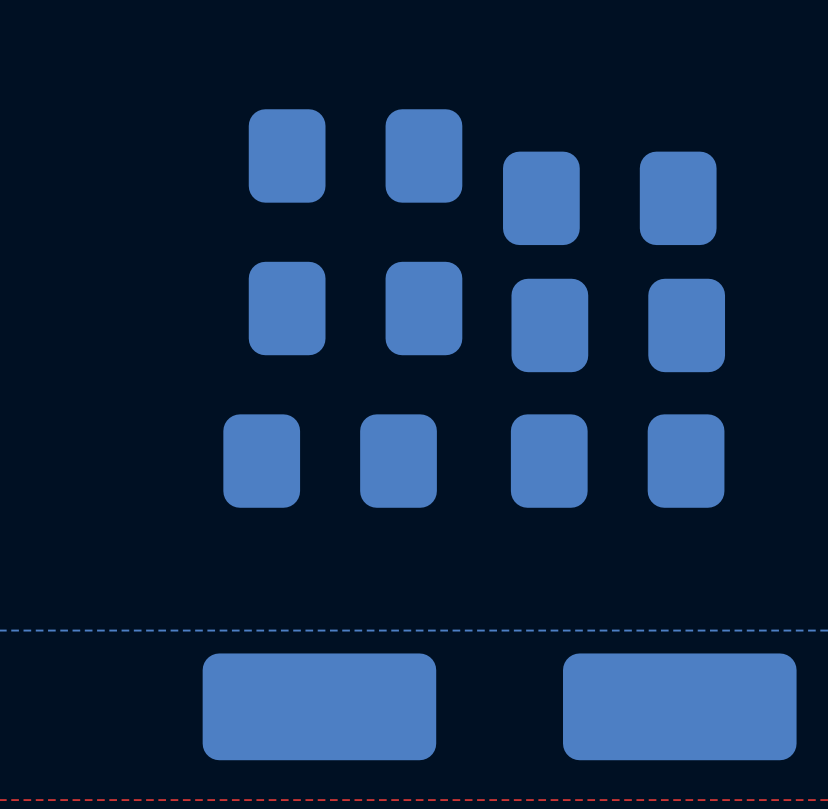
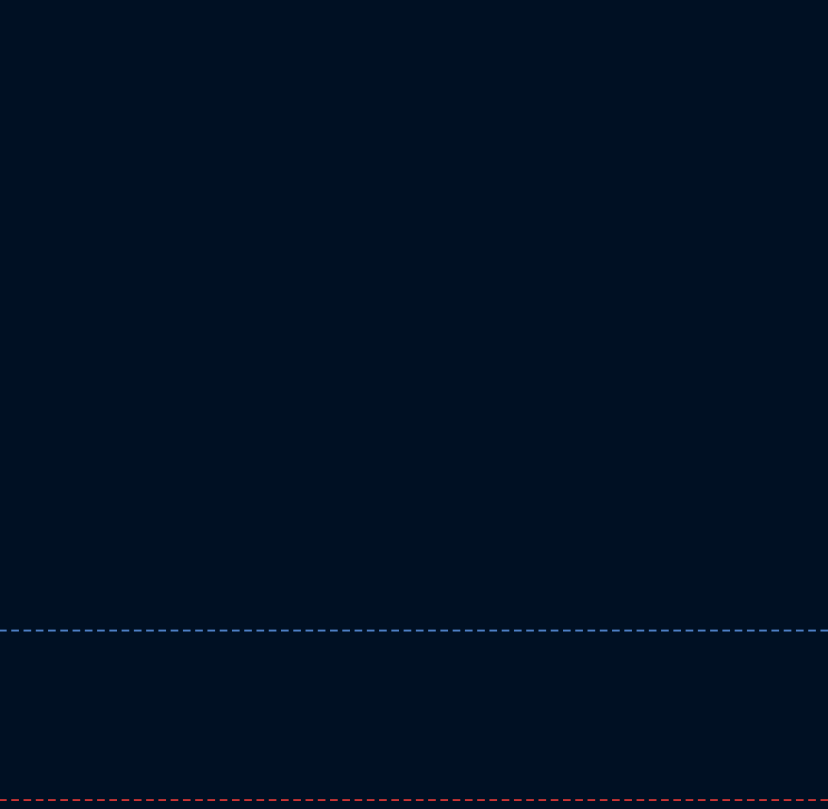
part: (355, 155) -> none
part: (609, 198) -> none
part: (355, 308) -> none
part: (618, 325) -> none
part: (330, 461) -> none
part: (617, 461) -> none
part: (499, 706) -> none

